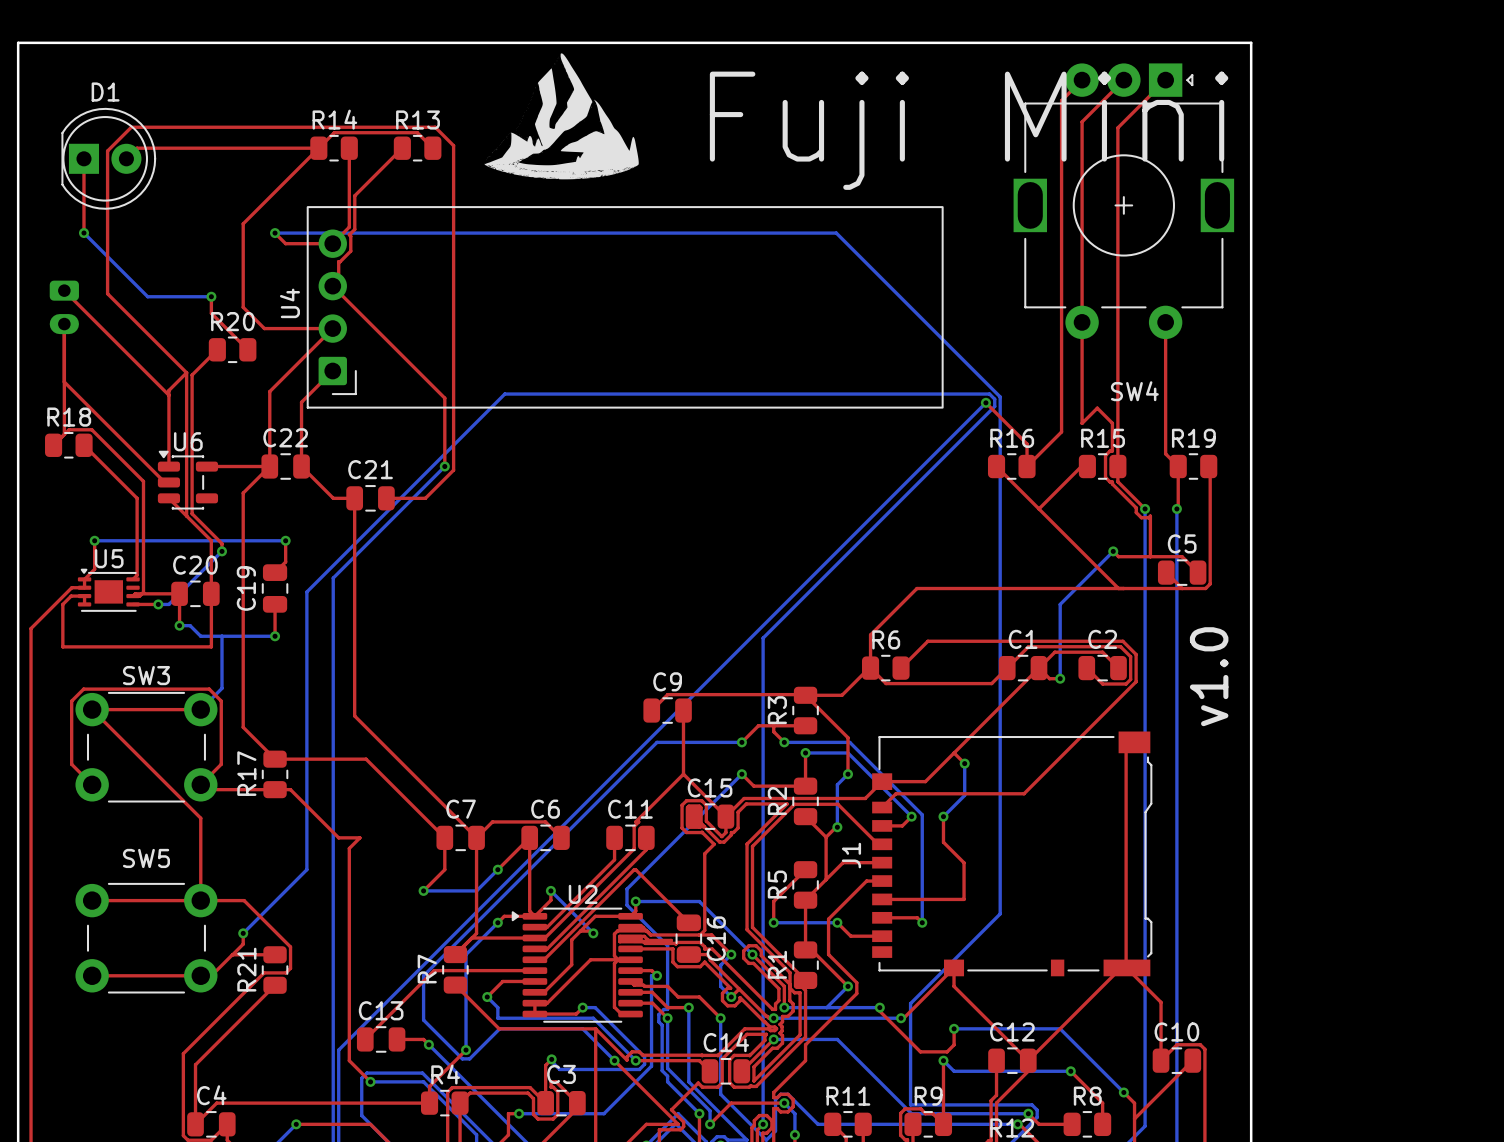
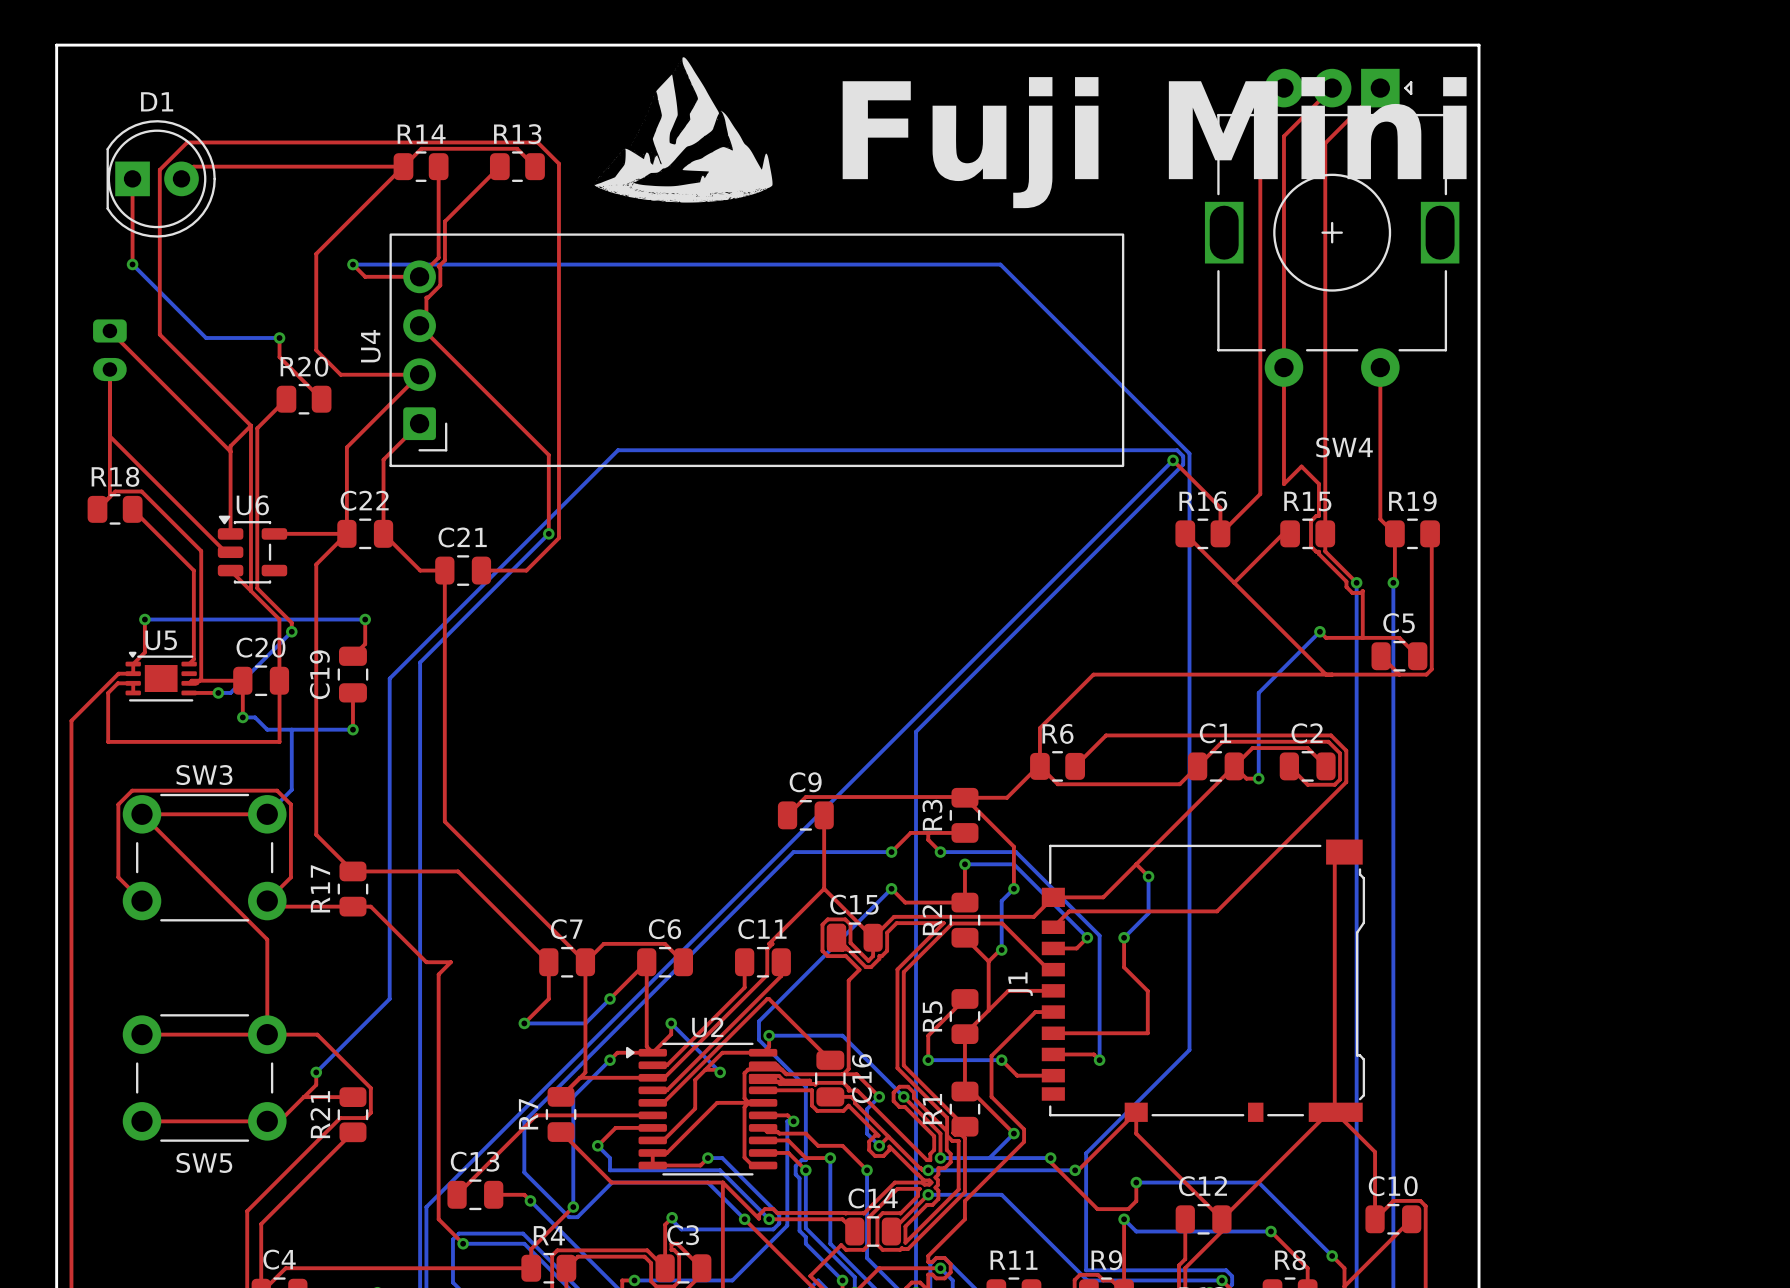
text: v1.0 (1209, 676) -> none
SW5 name position: SW5 (146, 858) -> SW5 (204, 1162)

